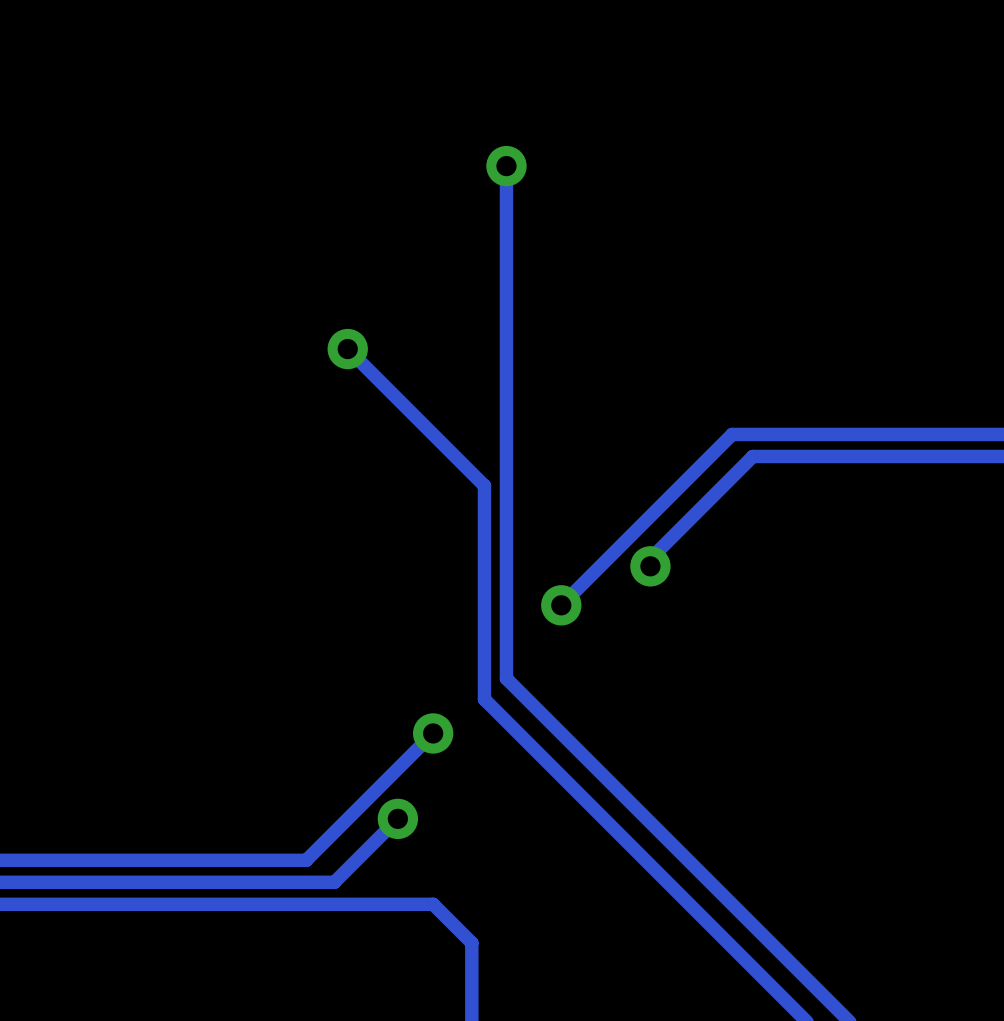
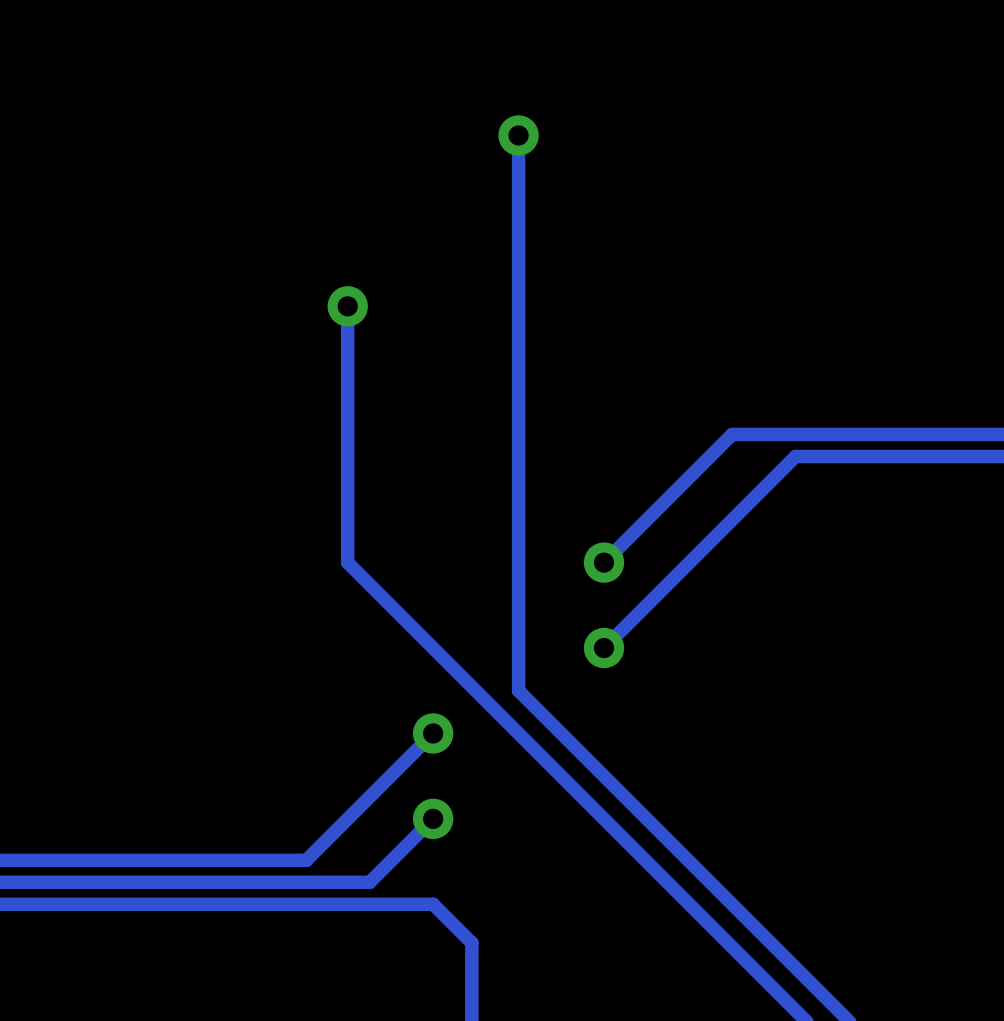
track: (506, 166) (506, 678) (518, 690) -> (518, 135) (518, 690)
via position: (506, 166) -> (518, 135)
track: (347, 349) (484, 485) (484, 699) -> (347, 306) (347, 562) (484, 699)
via position: (347, 349) -> (347, 306)
track: (795, 456) (752, 456) (650, 558) (650, 566) -> (795, 456) (604, 648)
track: (604, 562) (561, 605) -> none
via: none -> (604, 562)
via: (650, 566) -> none
via: (561, 605) -> none
via: none -> (604, 648)
track: (397, 818) (334, 882) -> (433, 818) (369, 882) (334, 882)
via position: (397, 818) -> (433, 818)

